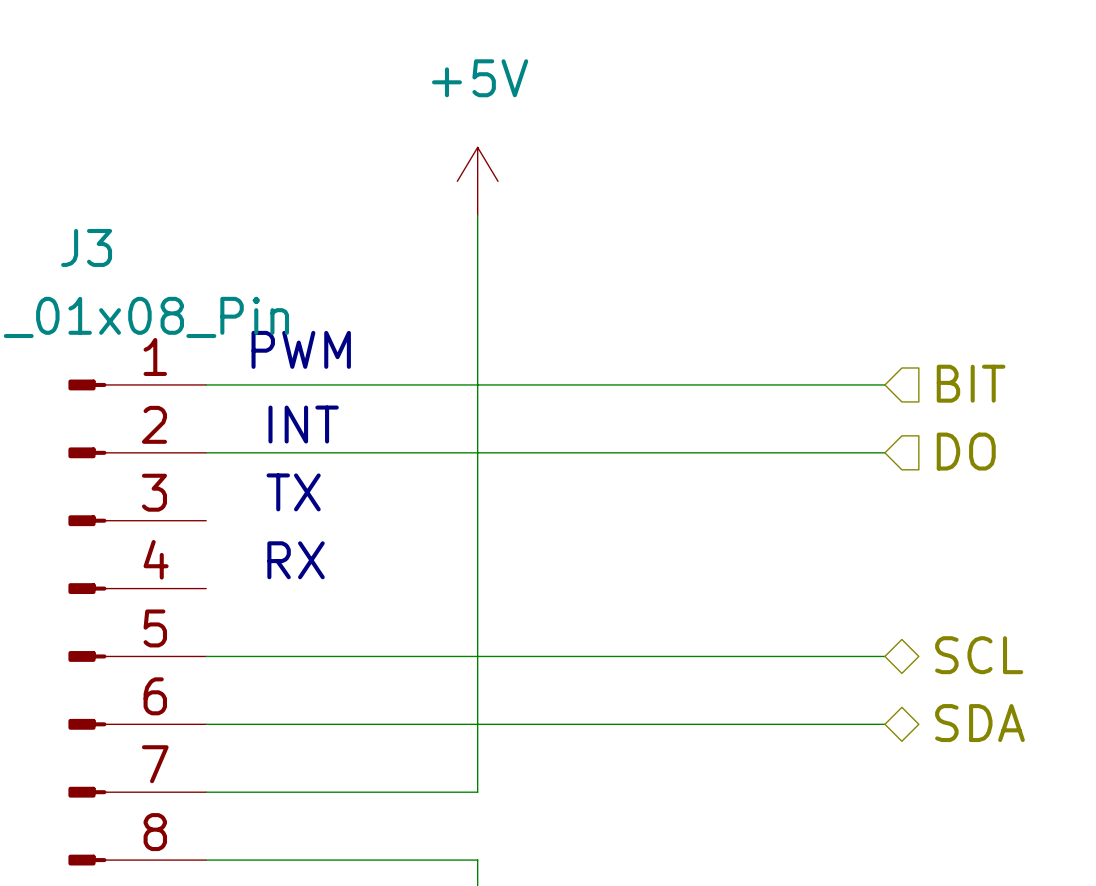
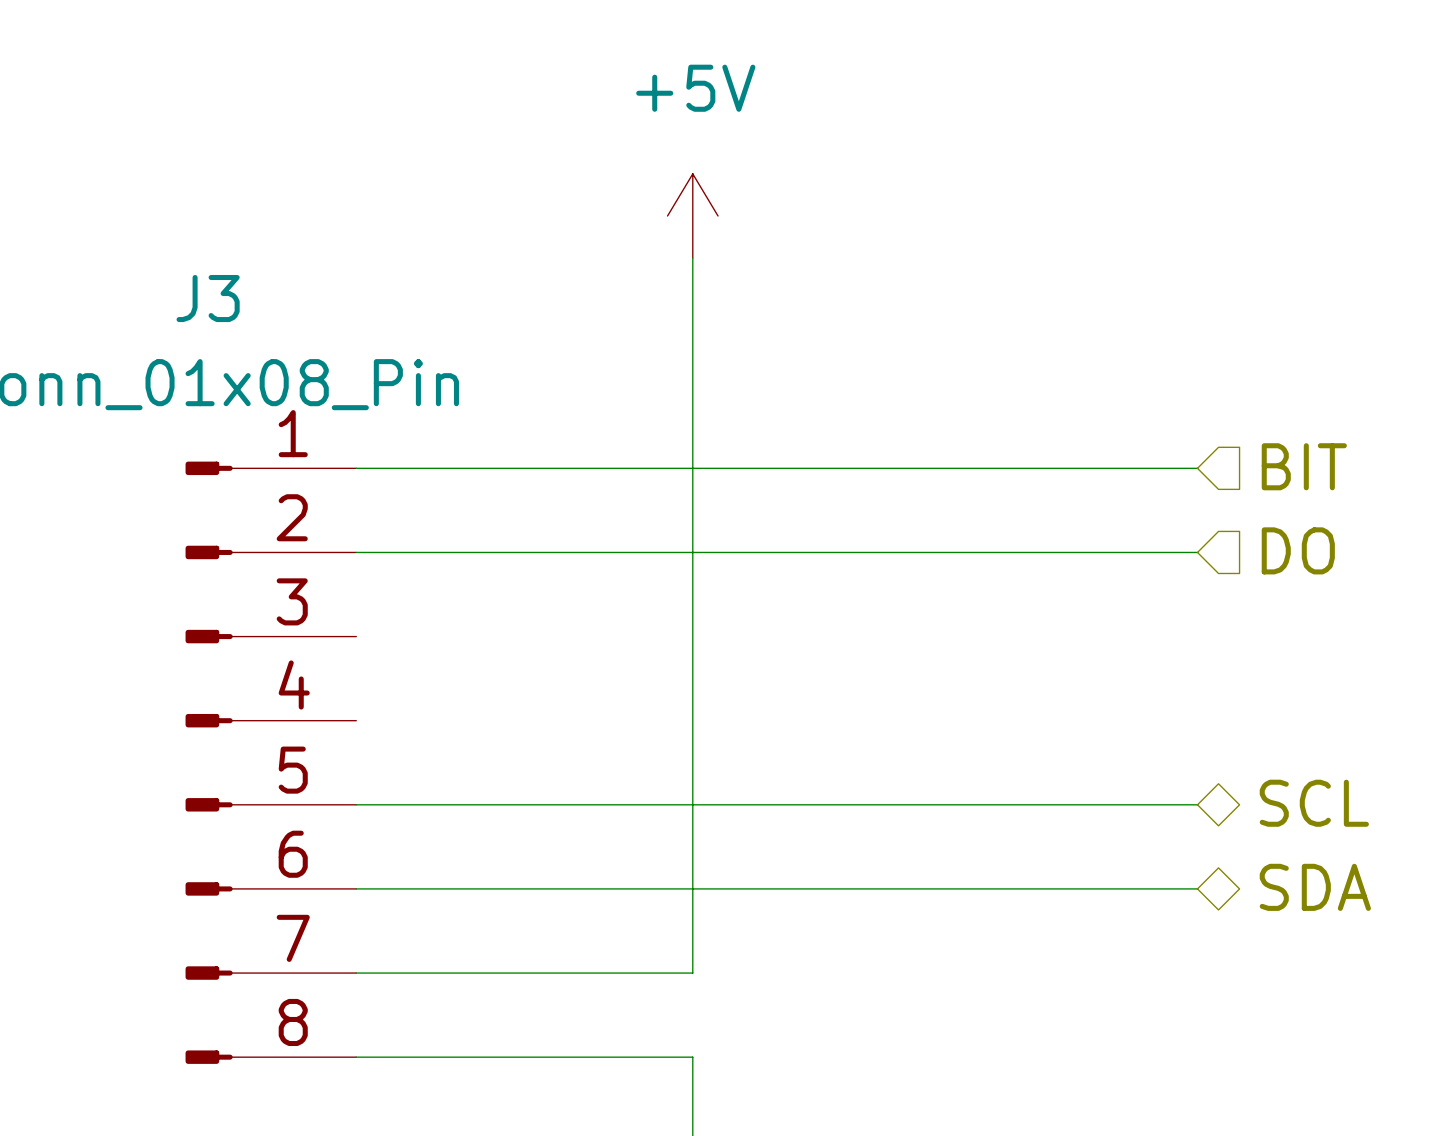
text: PWM (301, 349) -> none
text: INT (303, 424) -> none
text: TX (293, 492) -> none
text: RX (296, 560) -> none

